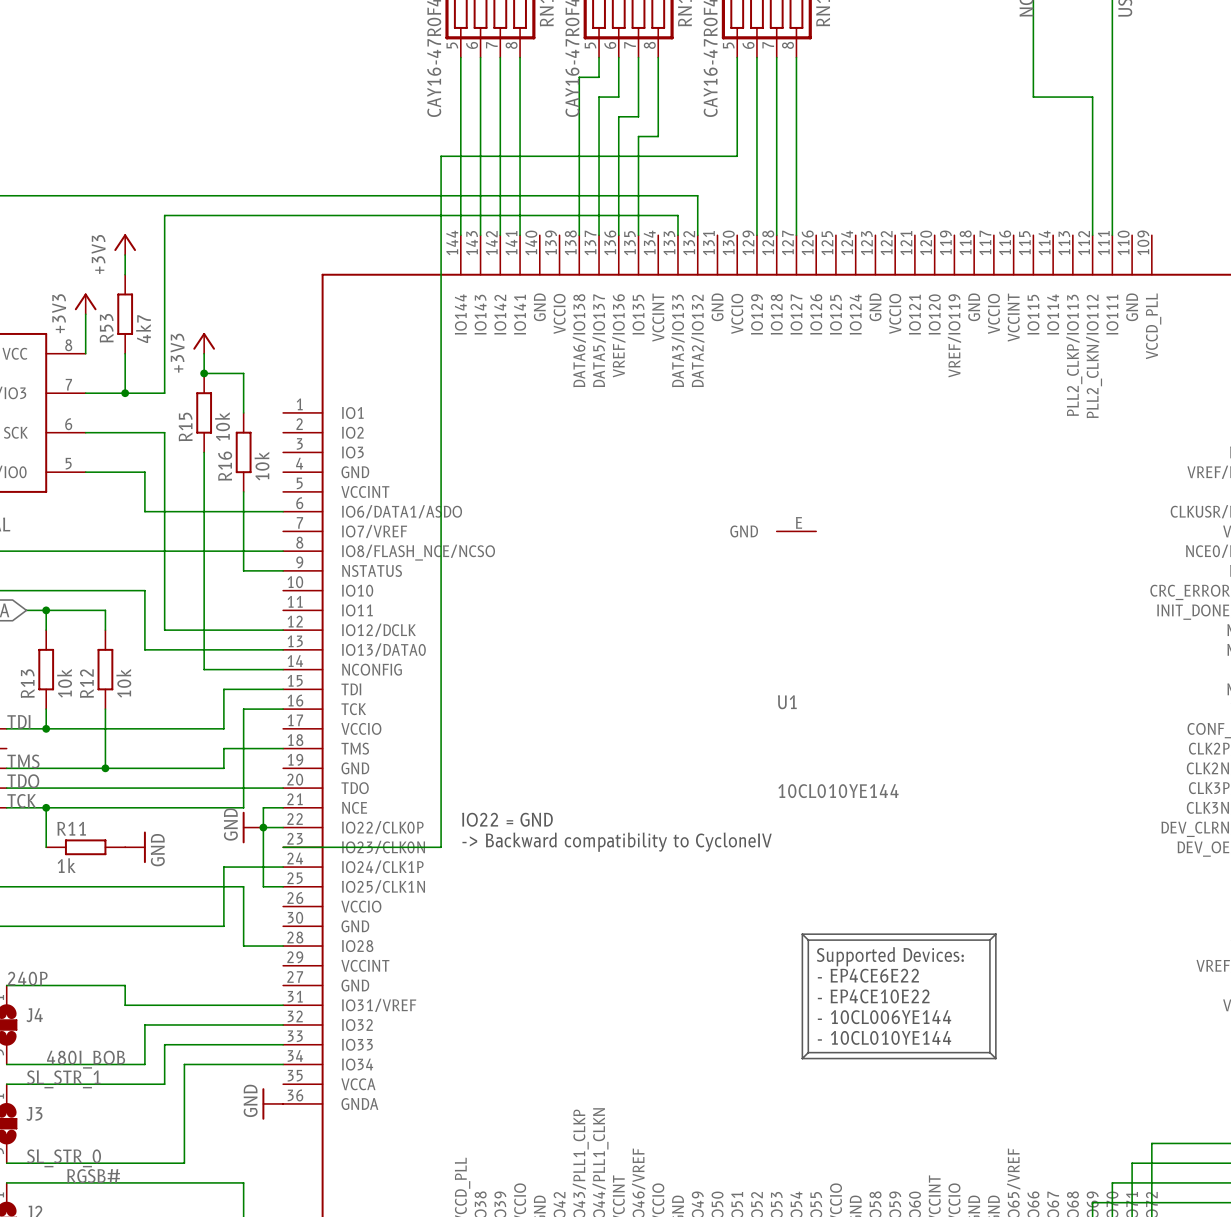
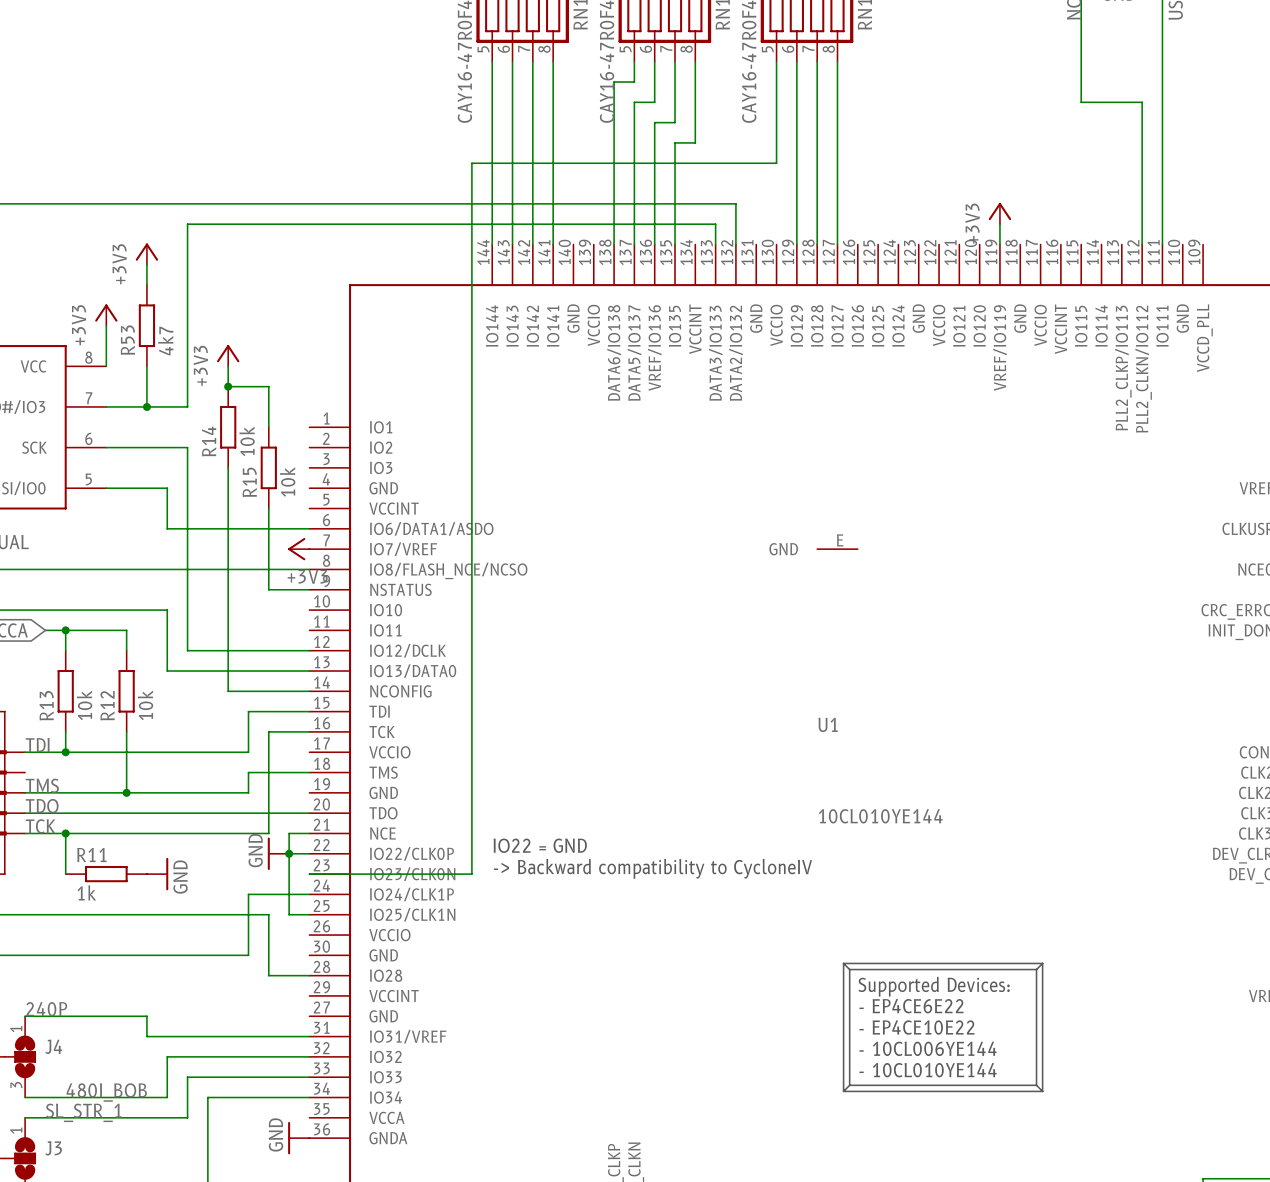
power symbol: none -> +3V3 (999, 213)
wire: none -> (999, 224) (999, 244)
R15 name: R15 (185, 426) -> R14 (209, 441)
R16 name: R16 (225, 466) -> R15 (249, 482)
power symbol: none -> +3V3 (298, 549)

